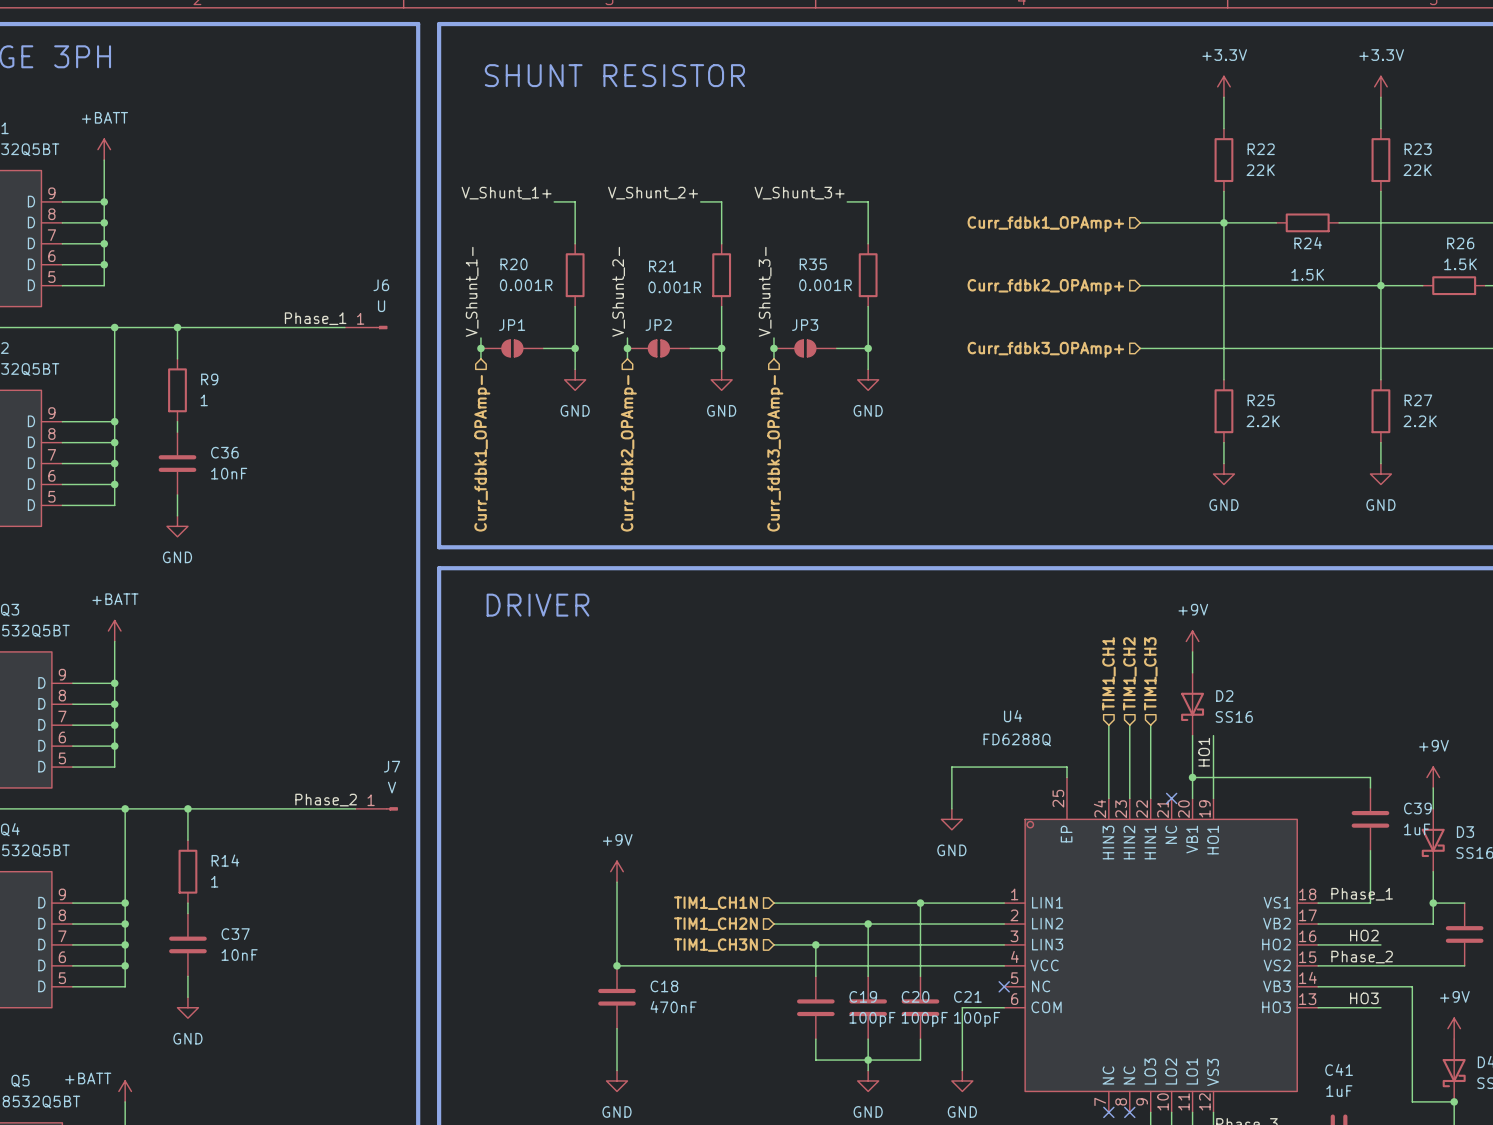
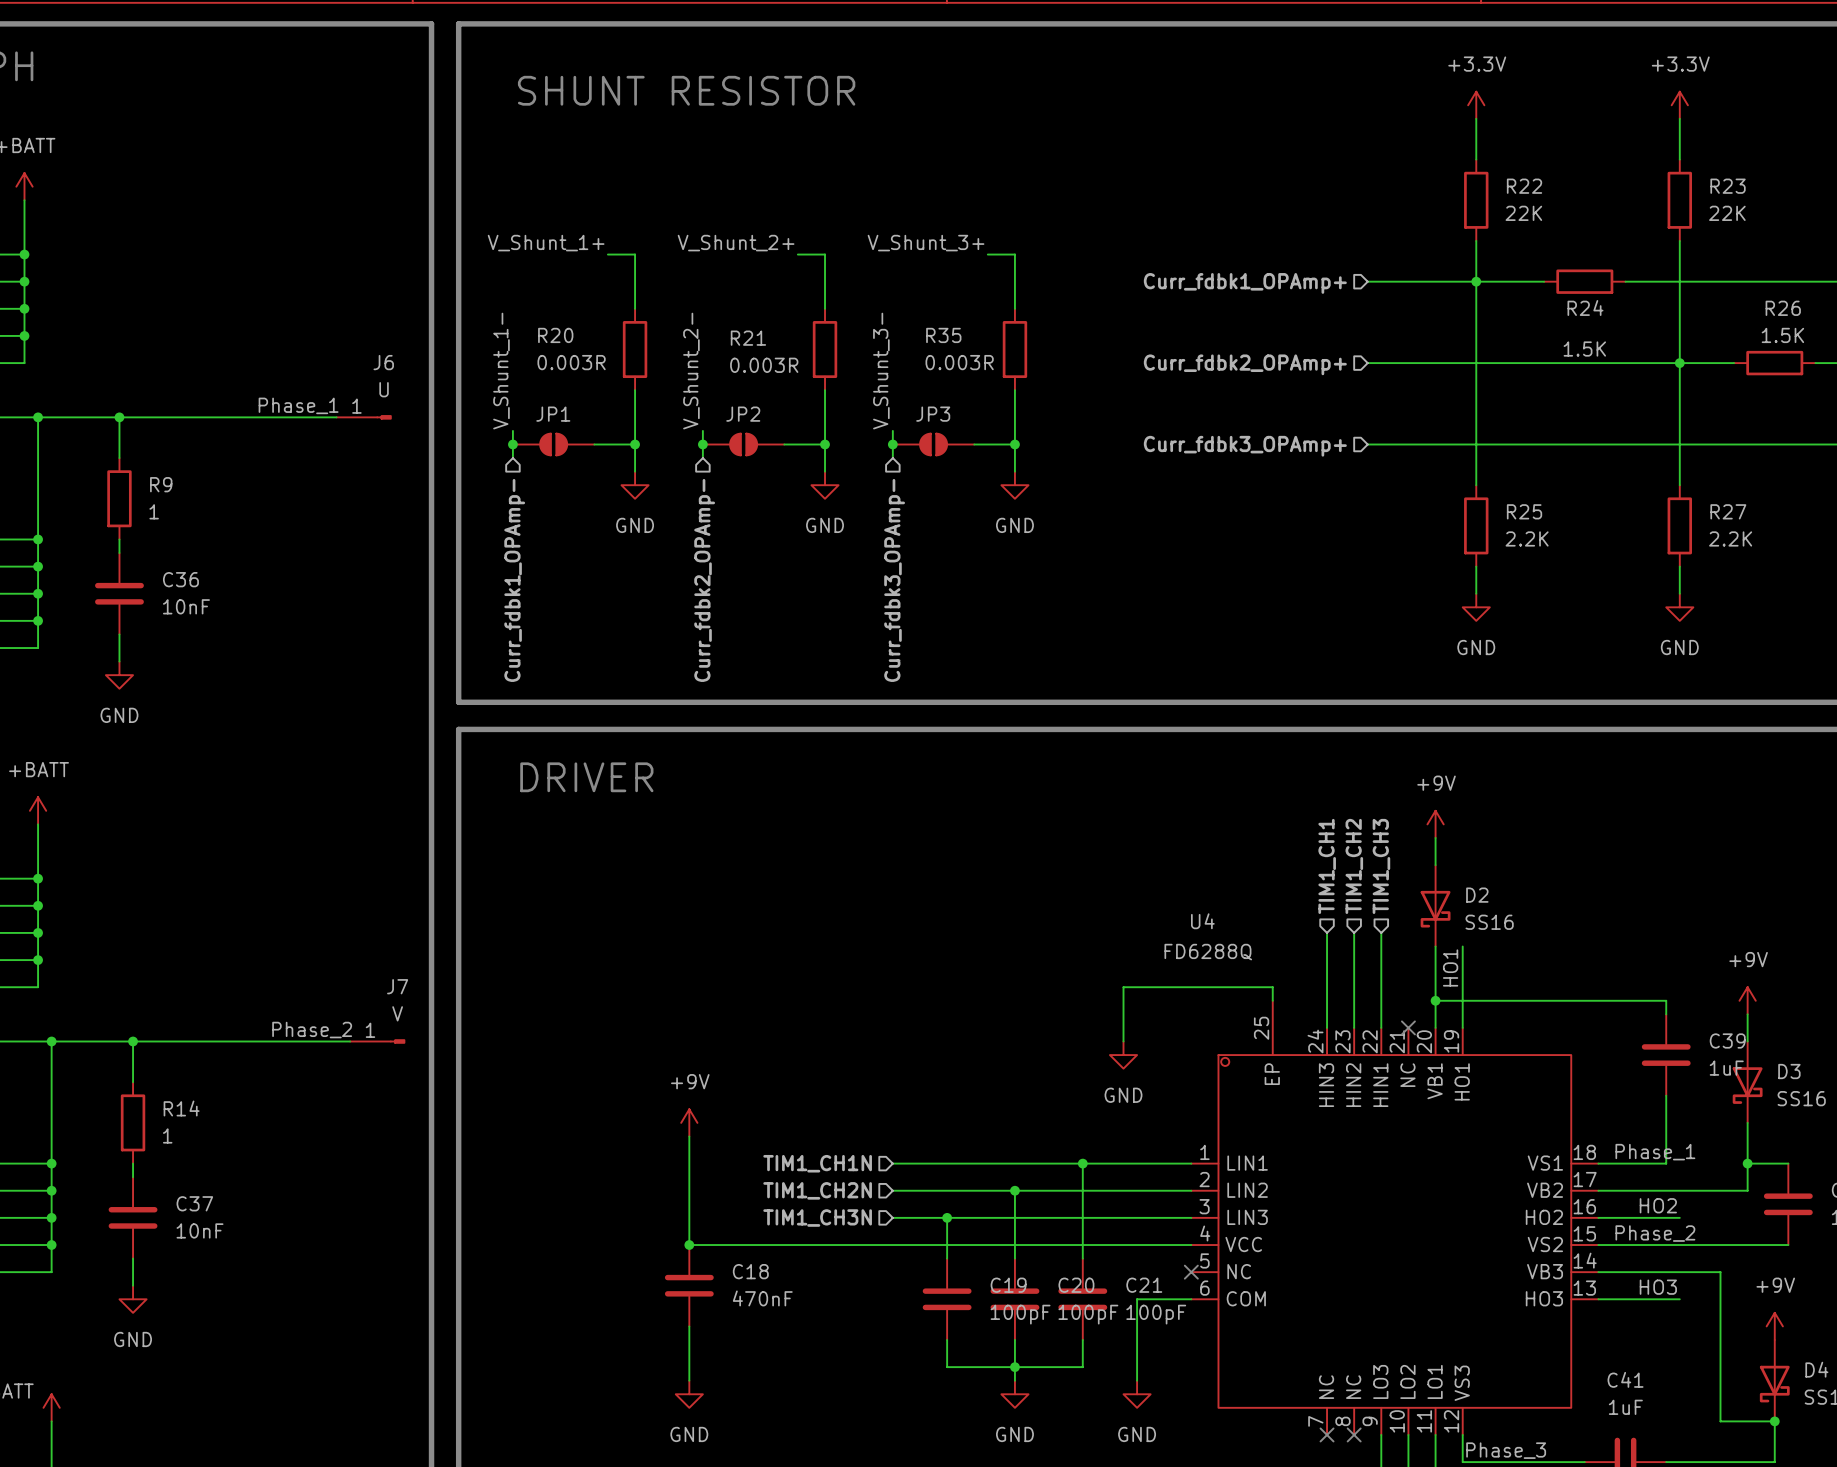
R20 value: 0.001R (526, 285) -> 0.003R (571, 362)
R35 value: 0.001R (825, 285) -> 0.003R (959, 362)
R21 value: 0.001R (674, 287) -> 0.003R (764, 365)

